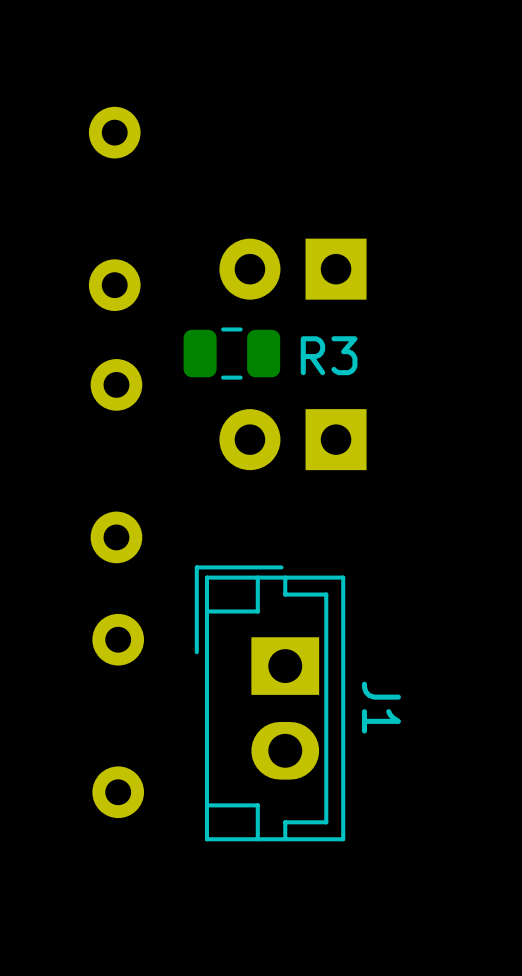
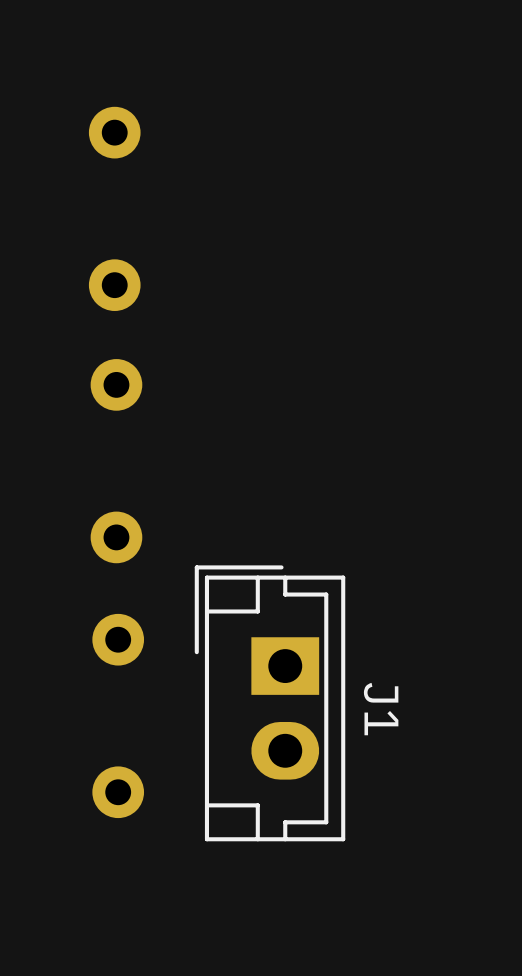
part: (292, 269) -> none
R3: (231, 353) -> none
part: (292, 439) -> none

